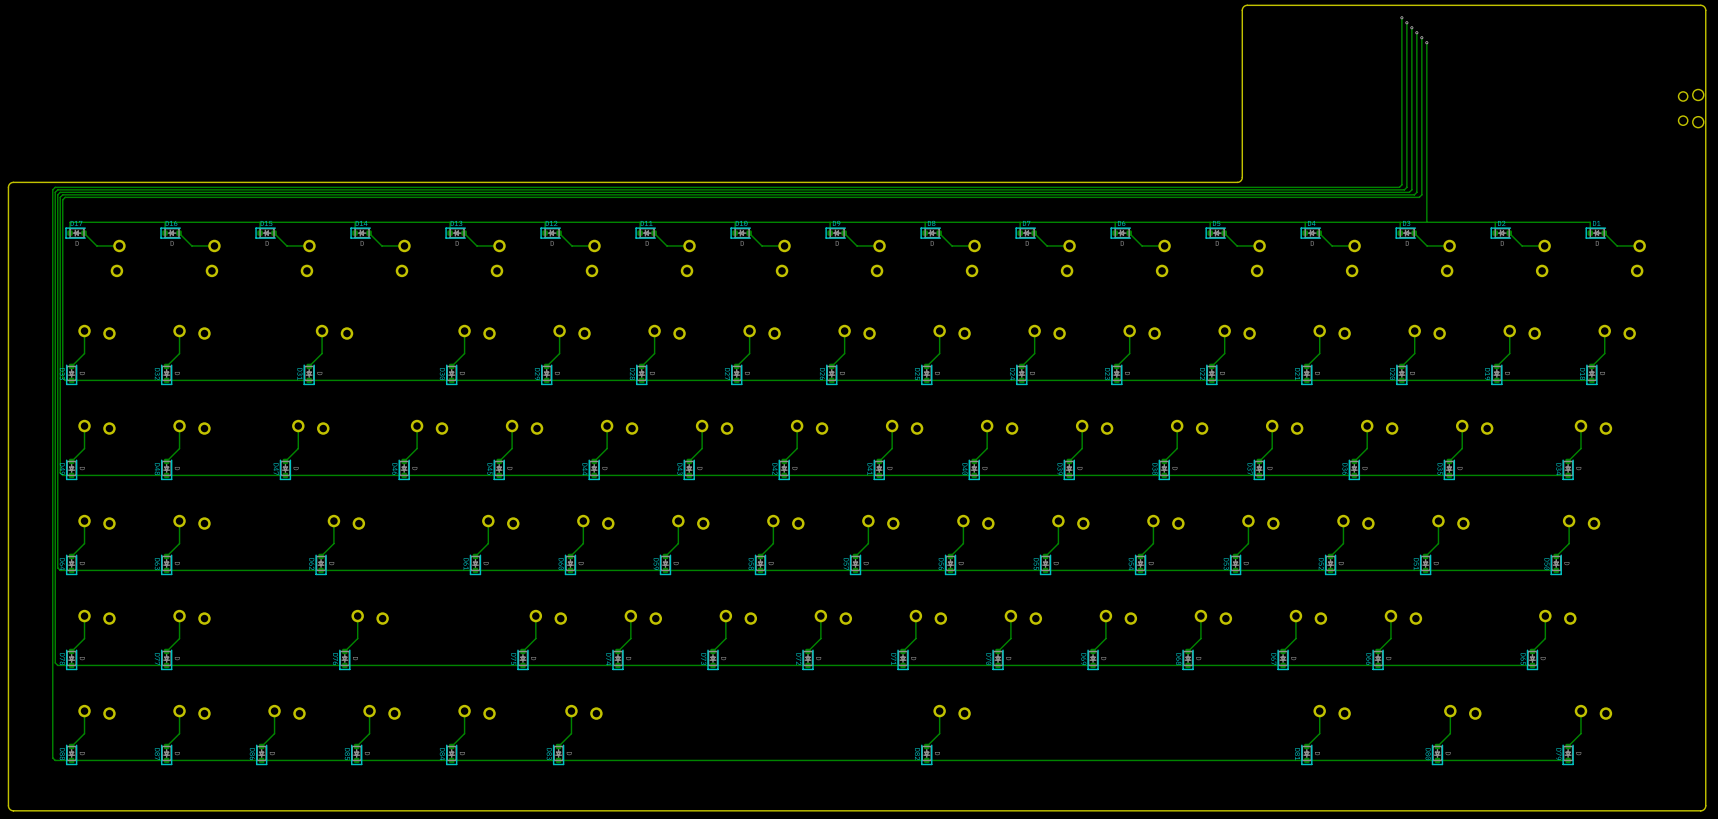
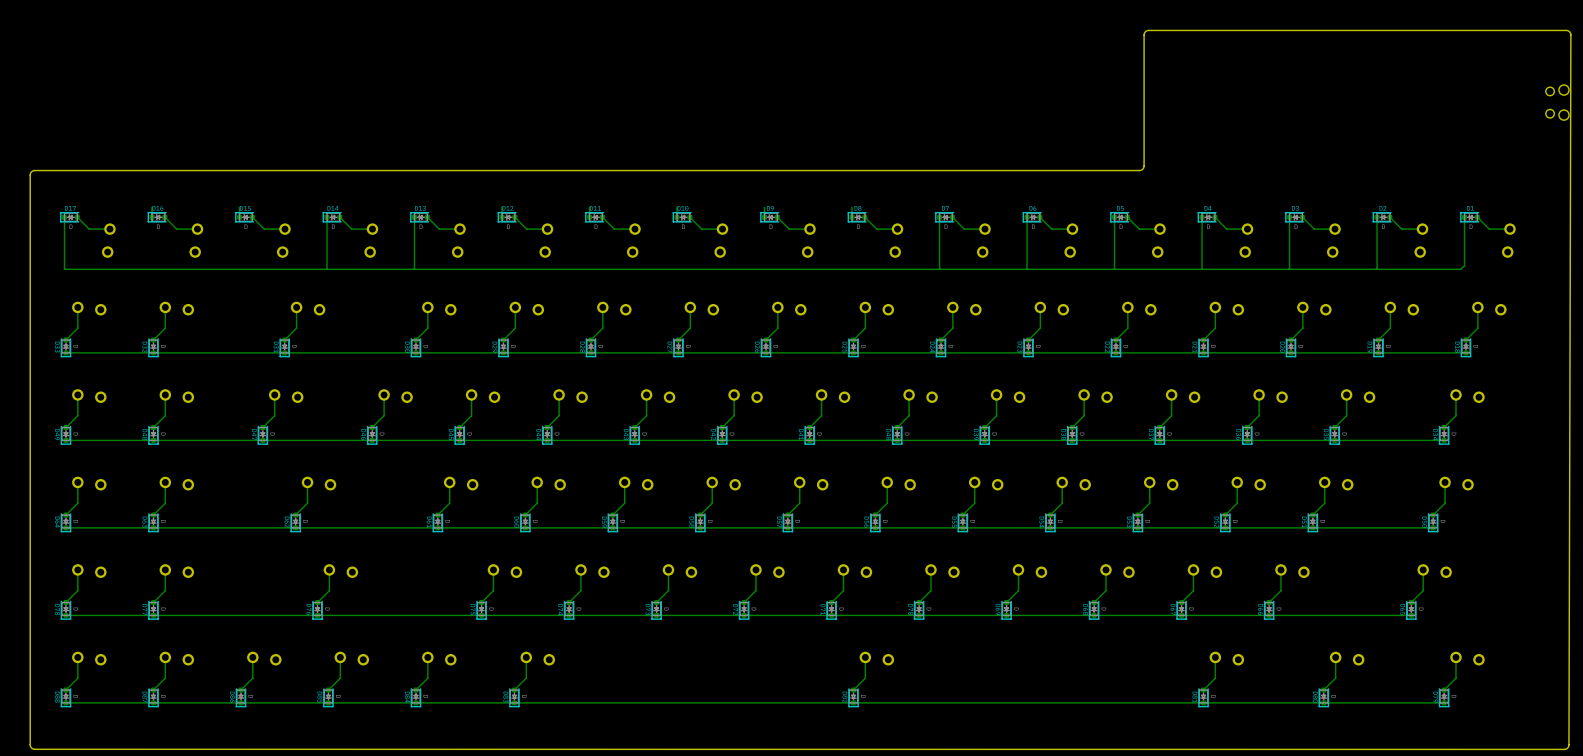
track: (1401, 17) (1401, 184) (1399, 187) (55, 187) (52, 189) (52, 757) (55, 760) (71, 760) -> none
via: (1401, 17) -> none
track: (1406, 22) (1406, 187) (1404, 189) (57, 189) (55, 192) (55, 662) (57, 665) (71, 665) -> none
via: (1406, 22) -> none
track: (1411, 27) (1411, 189) (1409, 192) (60, 192) (57, 194) (57, 567) (60, 570) (71, 570) -> none
via: (1411, 27) -> none
track: (1416, 32) (1416, 192) (1414, 194) (62, 194) (60, 197) (60, 472) (62, 475) (71, 475) -> none
via: (1416, 32) -> none
board edge: (1242, 35) (1242, 9) (1247, 5) (1700, 5) (1705, 7) (1705, 805) (1703, 810) (11, 810) (8, 805) (8, 187) (12, 182) (37, 182) -> (1144, 35) (1148, 30) (1566, 30) (1570, 32) (1568, 744) (1566, 748) (33, 749) (30, 744) (30, 175) (34, 170)
track: (1421, 37) (1421, 194) (1419, 197) (65, 197) (62, 199) (62, 377) (65, 380) (71, 380) -> none
via: (1421, 37) -> none
track: (1426, 42) (1426, 222) -> none
via: (1426, 42) -> none
track: (355, 222) (355, 233) -> (326, 269) (327, 217)
track: (450, 222) (450, 233) -> (413, 269) (414, 217)
track: (1020, 222) (1020, 233) -> (939, 269) (939, 217)
track: (1115, 222) (1115, 233) -> (1026, 269) (1027, 217)
track: (1210, 222) (1210, 233) -> (1114, 269) (1114, 217)
track: (1305, 222) (1305, 233) -> (1201, 269) (1202, 217)
track: (1400, 222) (1400, 233) -> (1288, 269) (1289, 217)
track: (1495, 222) (1495, 233) -> (1376, 269) (1377, 217)
track: (1590, 233) (1590, 222) (70, 222) (70, 233) -> (1464, 217) (1464, 265) (1461, 269) (64, 269) (64, 217)

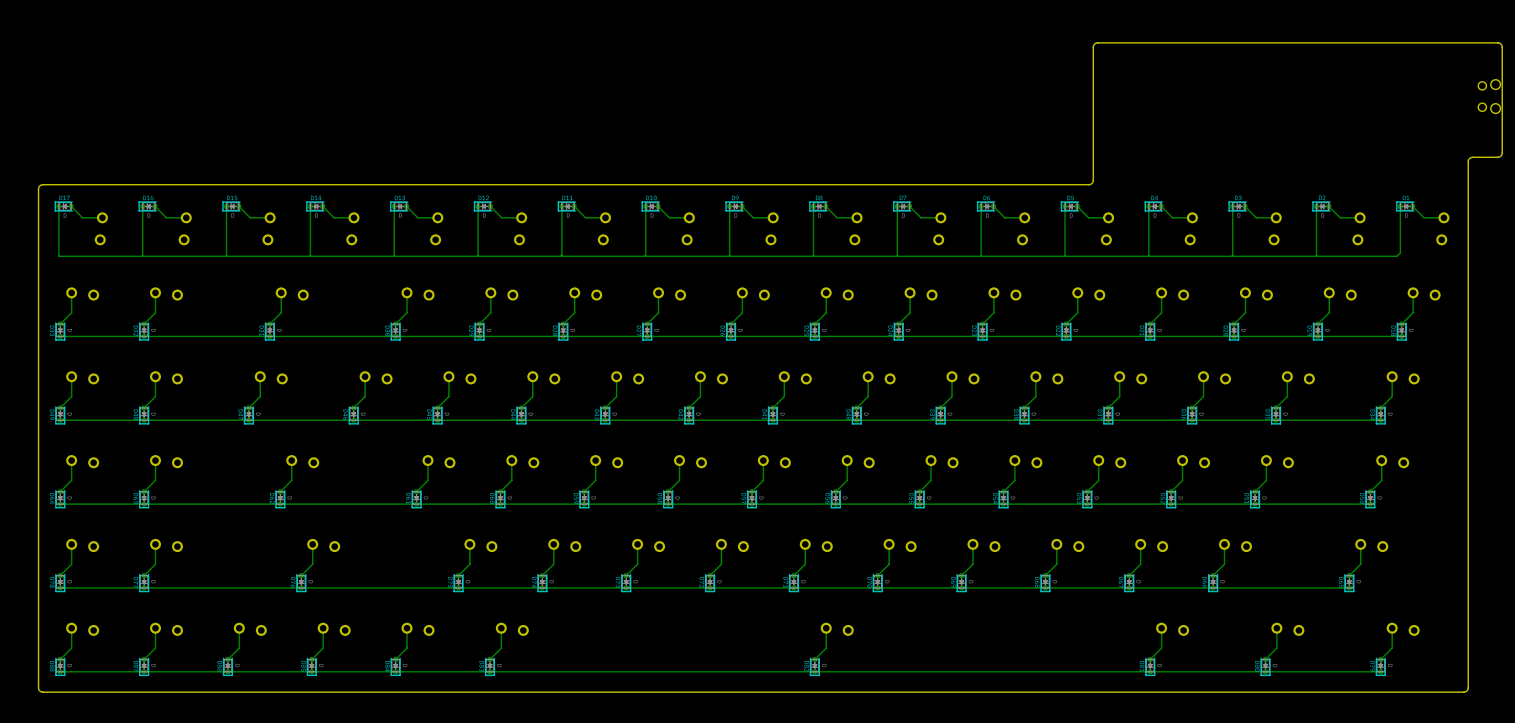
board edge: (1144, 51) (1144, 34) (1148, 30) (1566, 30) (1570, 32) (1568, 744) (1566, 748) (34, 749) (30, 746) (30, 175) (32, 171) (1139, 170) (1144, 165) -> (1093, 47) (1097, 42) (1497, 42) (1501, 45) (1502, 154) (1498, 157) (1471, 157) (1468, 161) (1468, 687) (1466, 691) (42, 692) (39, 689) (38, 189) (40, 185) (1088, 184) (1093, 180) (1093, 157)
track: (152, 207) (152, 217) -> (142, 256) (142, 206)
track: (239, 207) (239, 217) -> (226, 256) (226, 206)
track: (502, 207) (502, 217) -> (477, 256) (478, 206)
track: (589, 207) (589, 217) -> (560, 256) (561, 206)
track: (677, 207) (677, 217) -> (644, 256) (645, 206)
track: (764, 207) (764, 217) -> (730, 256) (729, 206)
track: (852, 207) (852, 217) -> (813, 256) (813, 206)

